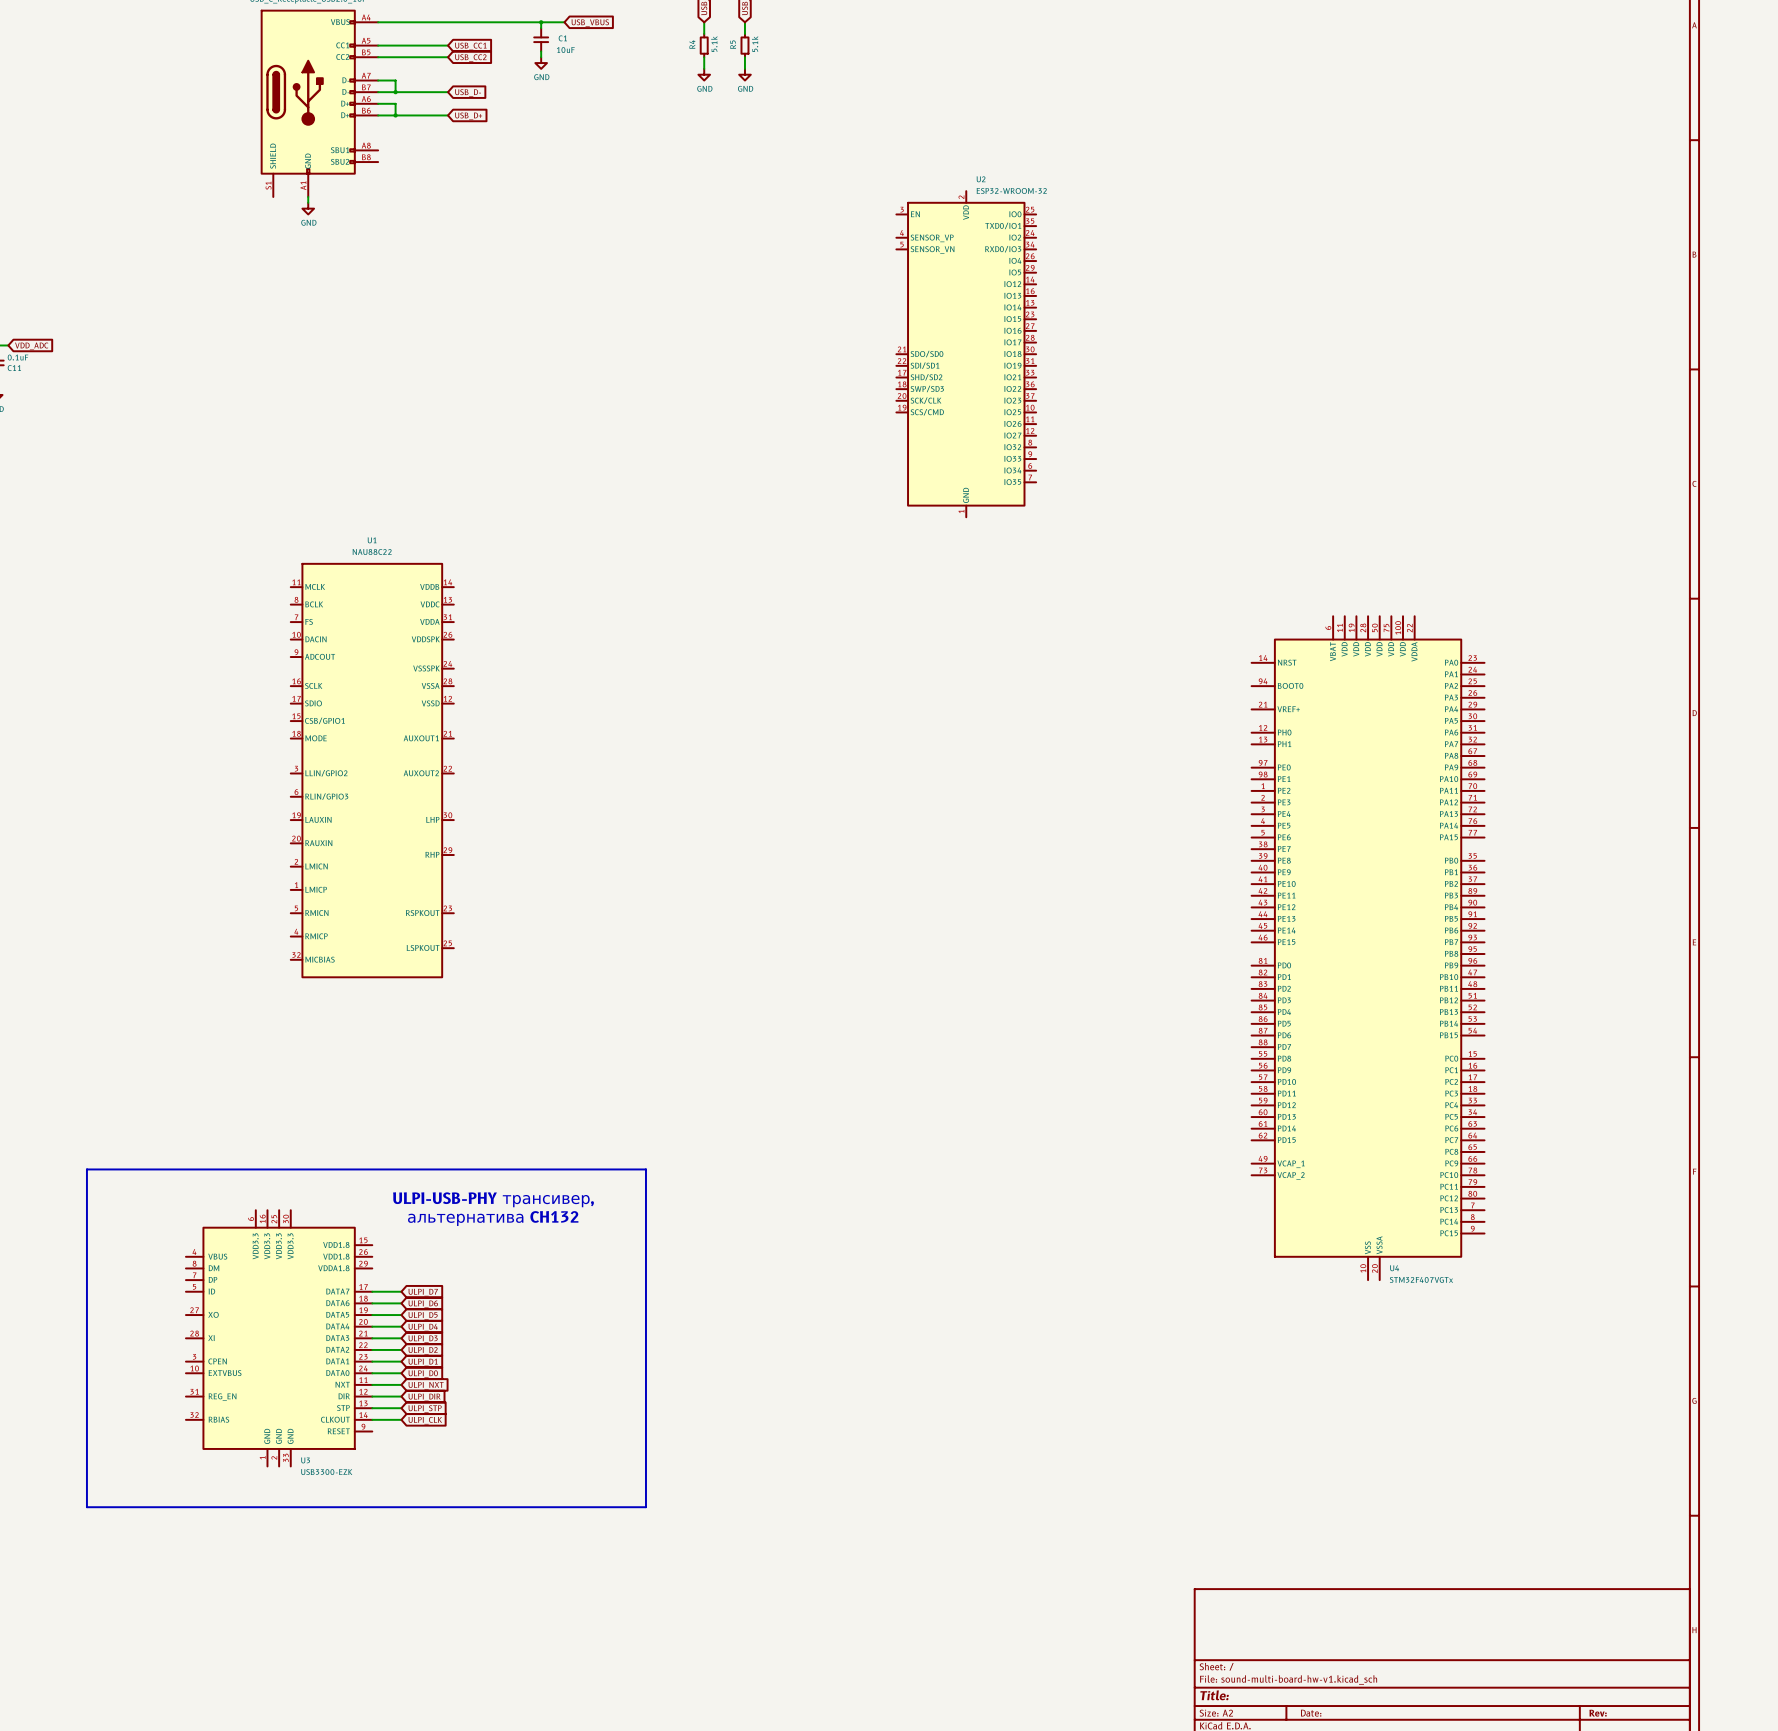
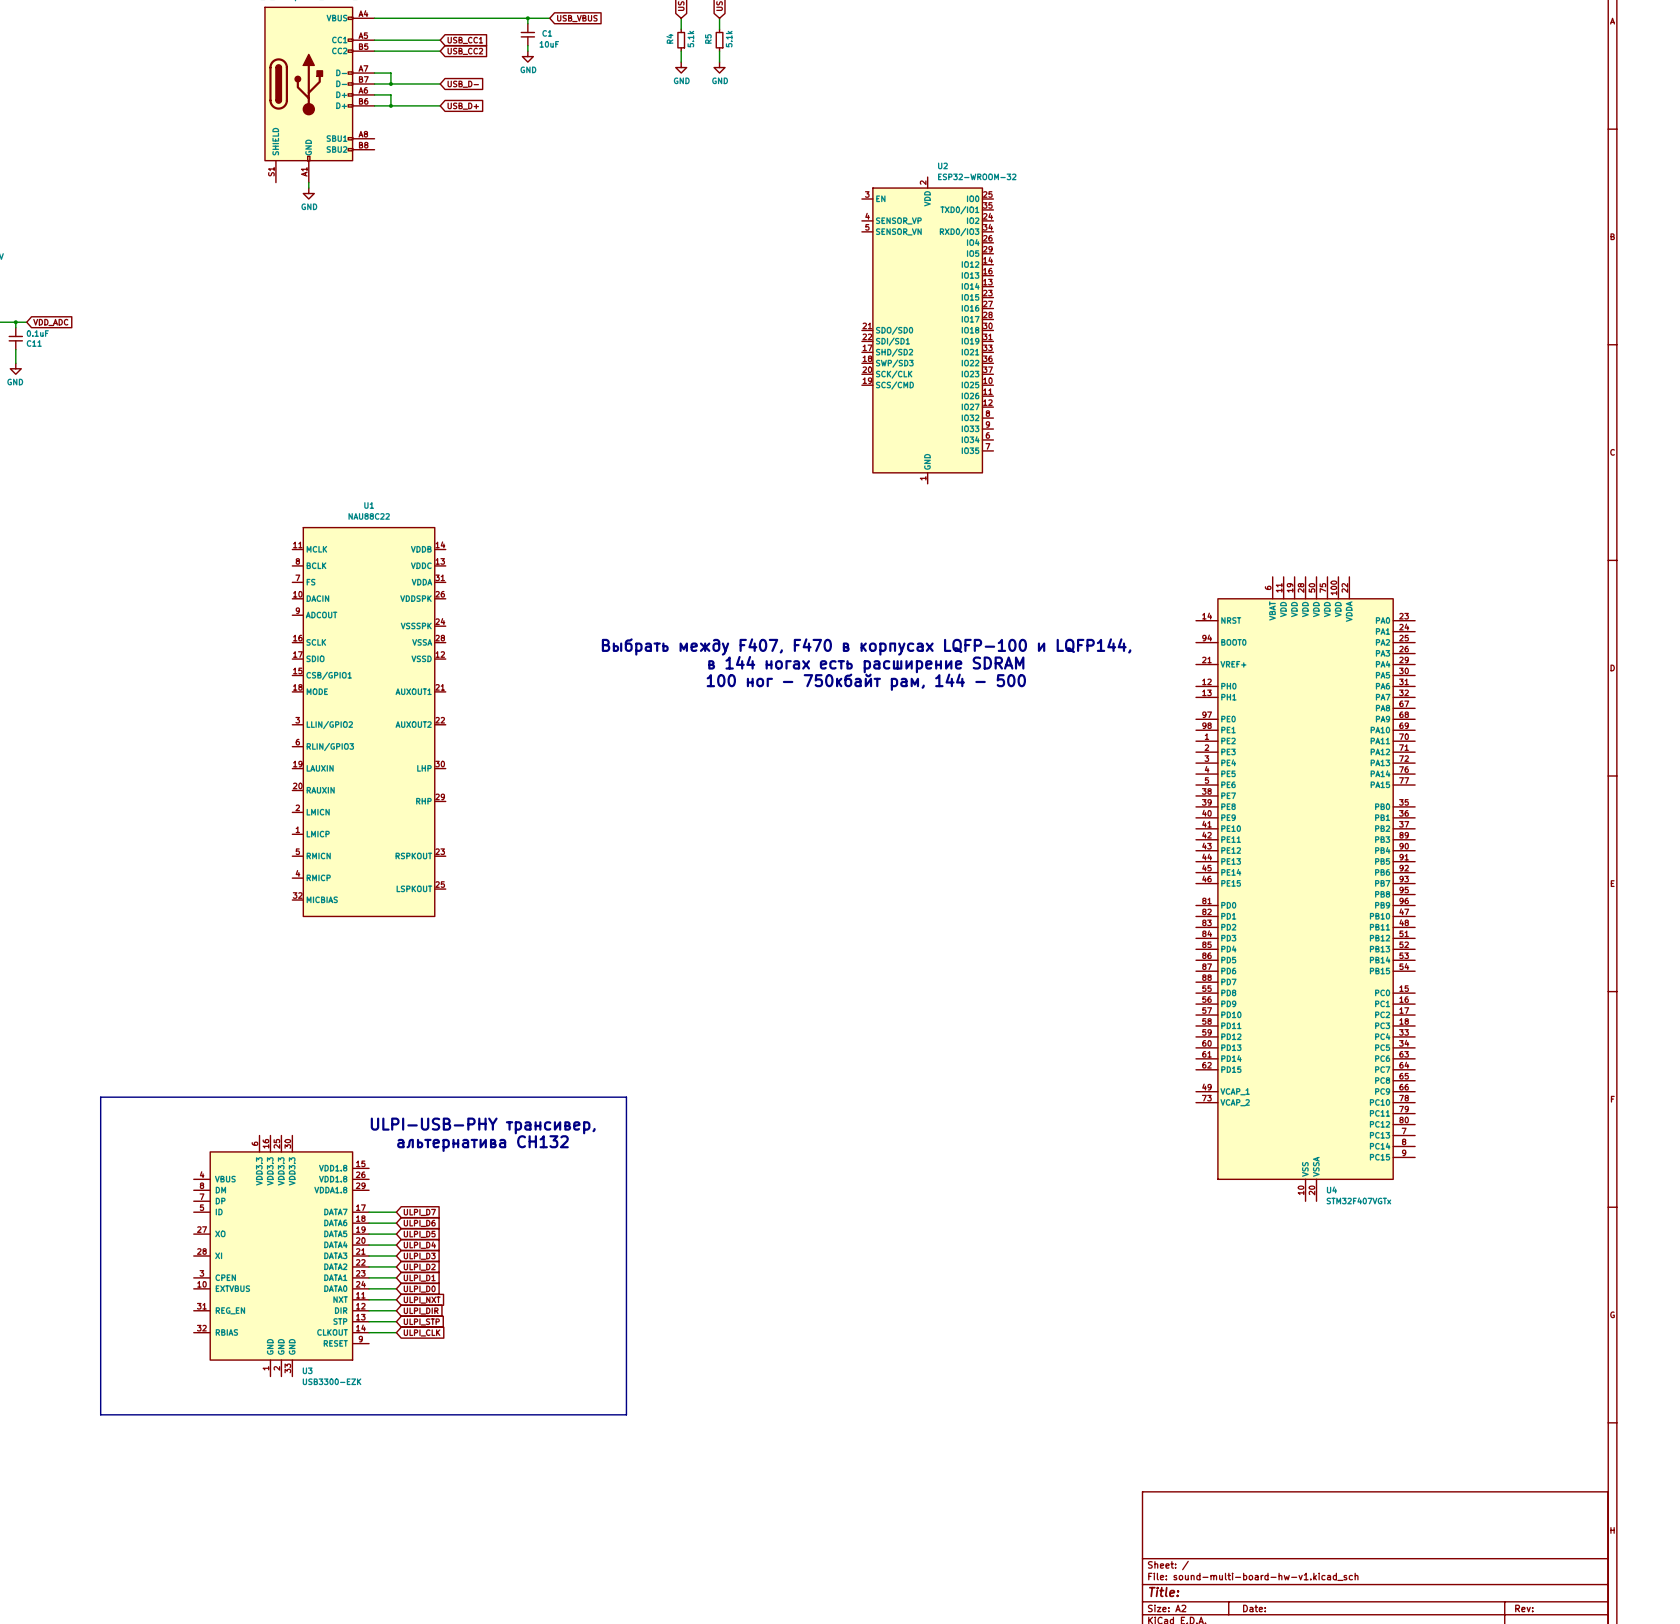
text: none -> Выбрать между F407, F470 в корпусах LQFP-100 и LQFP144, (866, 646)
text: none -> в 144 ногах есть расширение SDRAM (866, 664)
text: none -> 100 ног - 750кбайт рам, 144 - 500 (866, 682)

